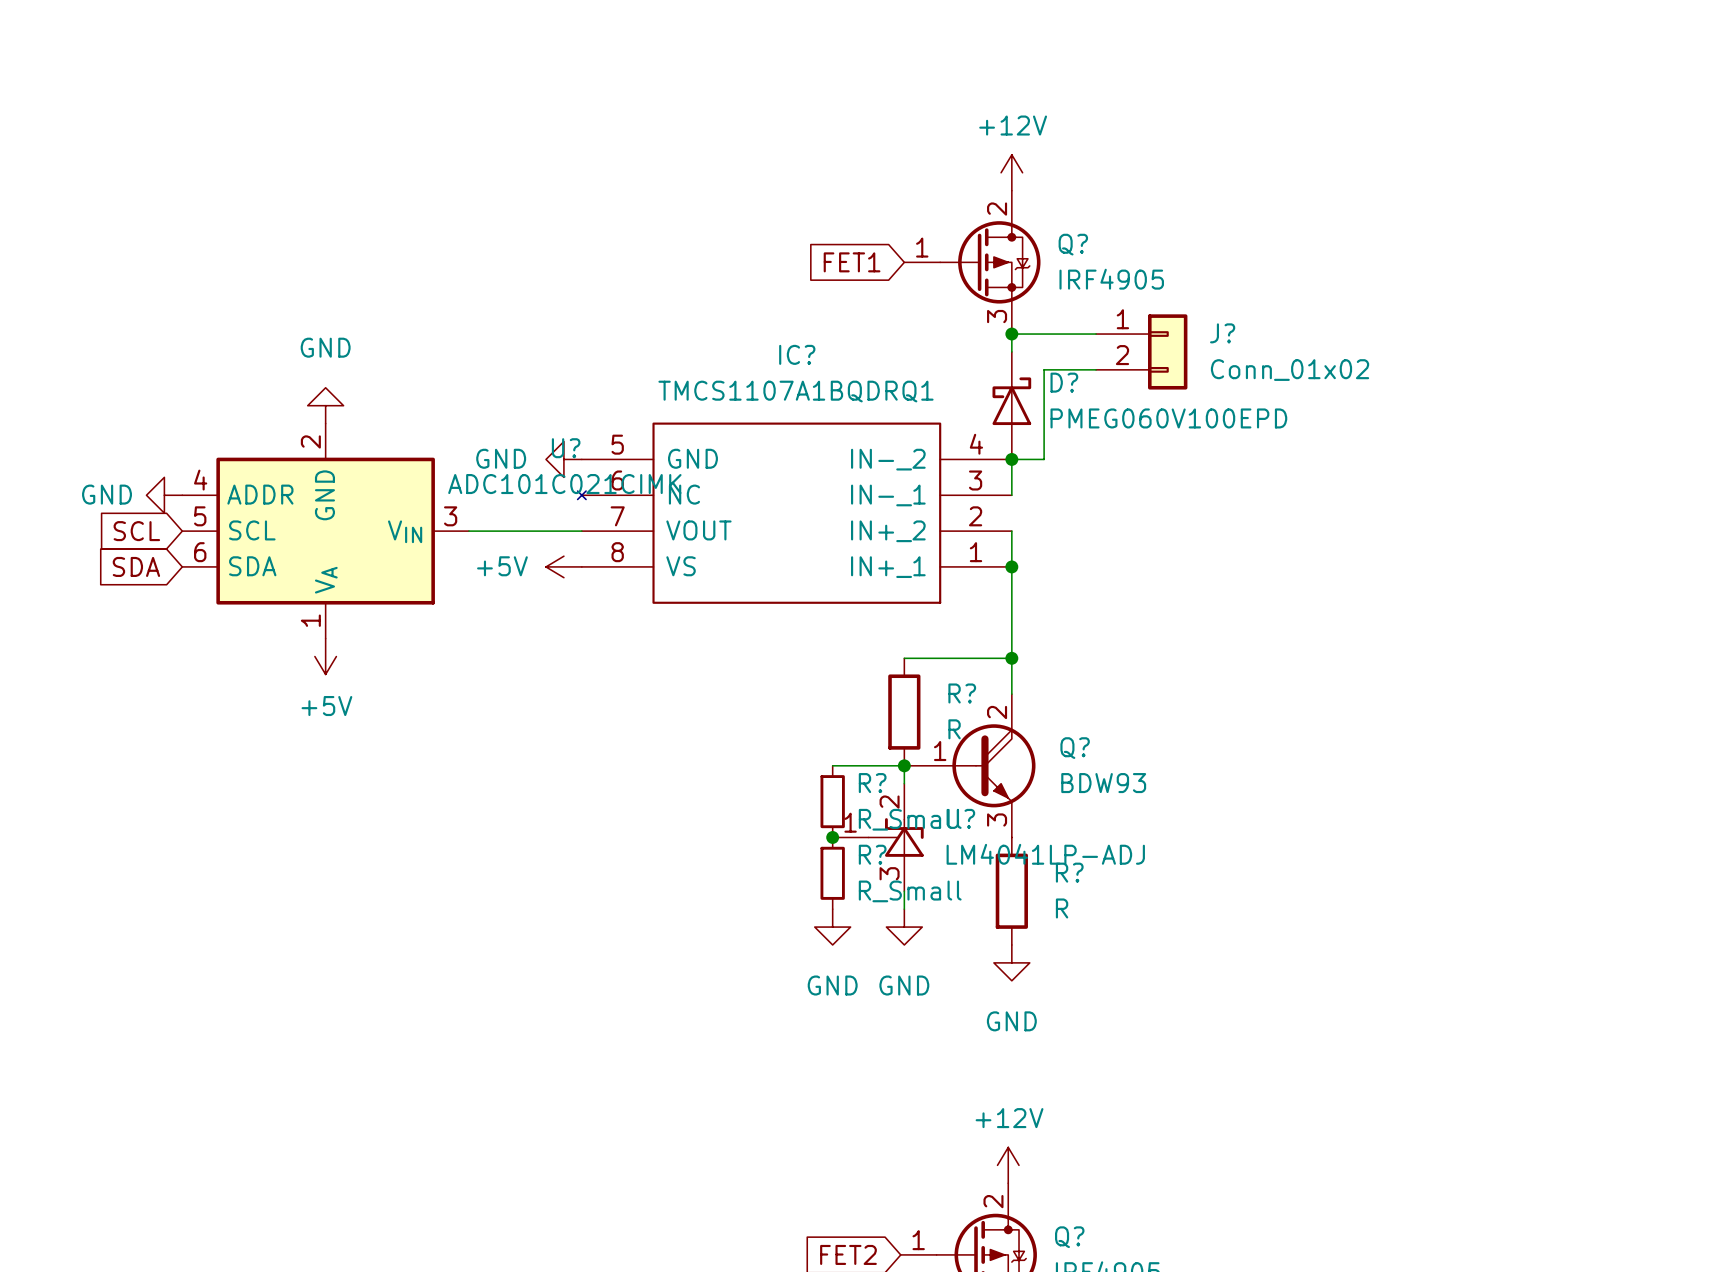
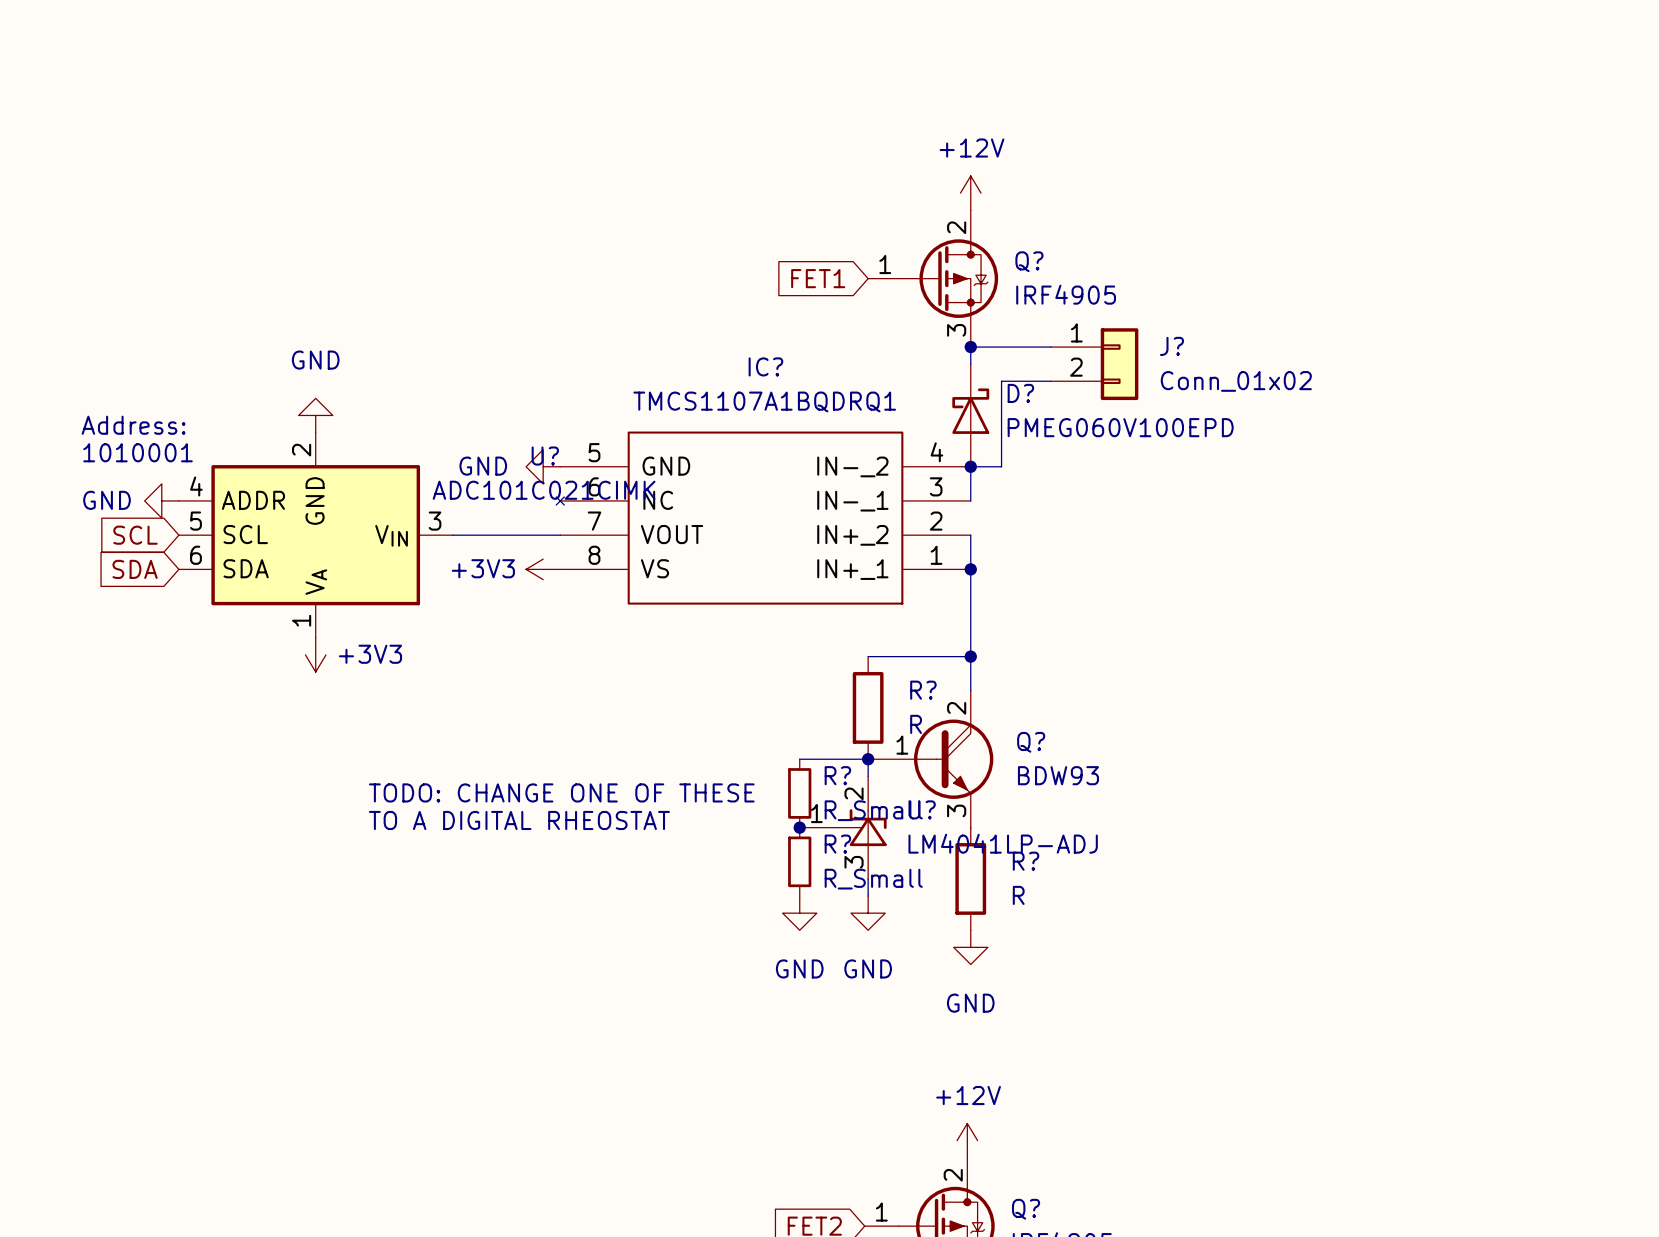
text: none -> Address: (133, 425)
text: none -> 1010001 (138, 452)
power symbol: +5V (563, 566) -> +3V3 (543, 569)
power symbol: +5V (325, 656) -> +3V3 (315, 654)
text: none -> TODO: CHANGE ONE OF THESE (561, 792)
text: none -> TO A DIGITAL RHEOSTAT (519, 820)

